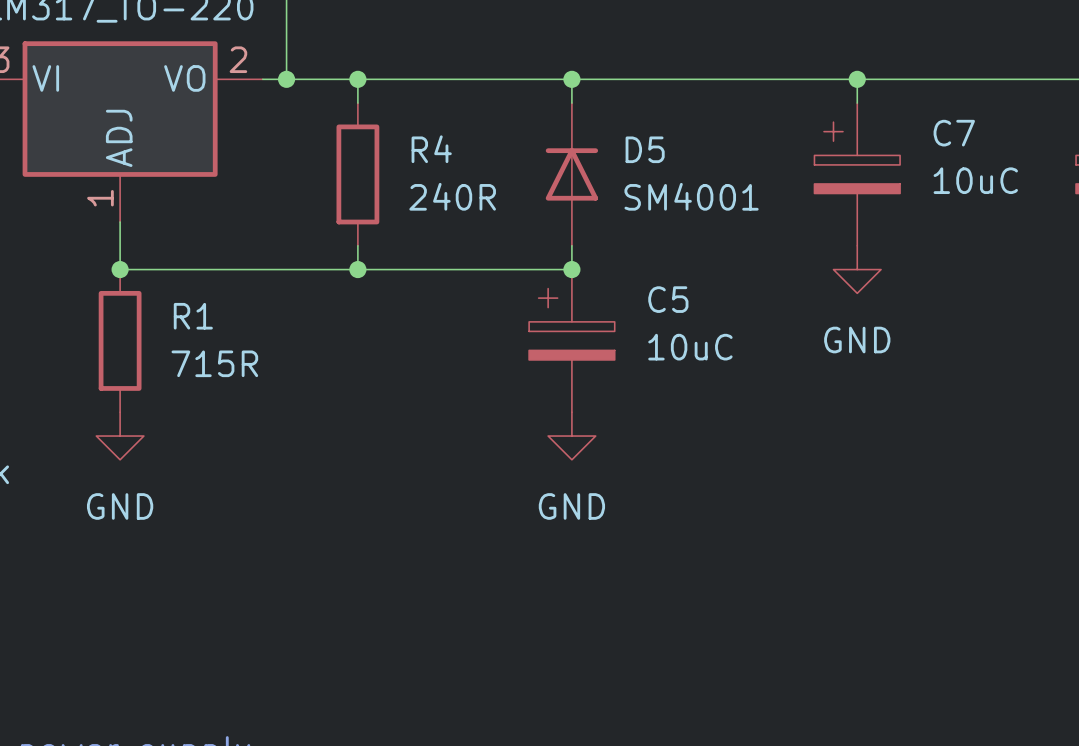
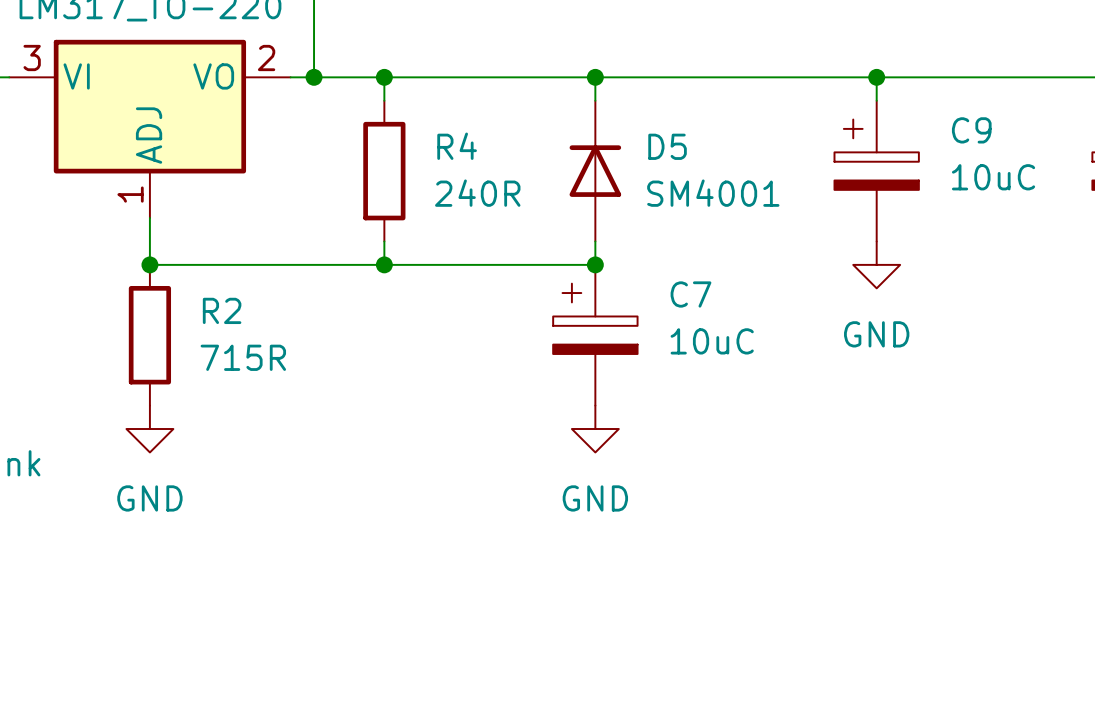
C7 name: C7 (954, 133) -> C9 (971, 130)
C5 name: C5 (668, 299) -> C7 (690, 294)
R1 name: R1 (193, 316) -> R2 (222, 310)

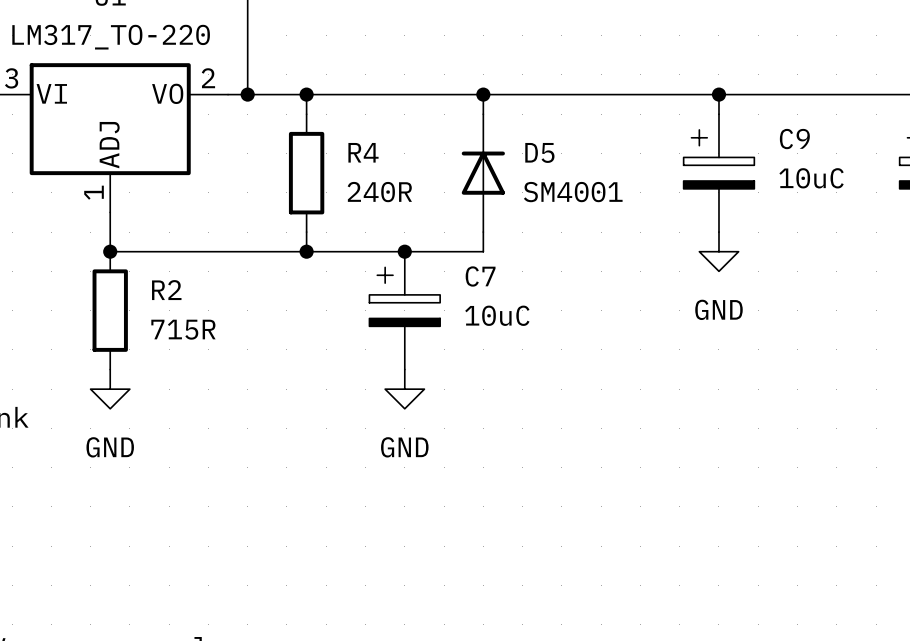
junction position: (595, 264) -> (404, 251)
C7 position: (595, 335) -> (404, 310)
power symbol position: GND (595, 429) -> GND (404, 389)

